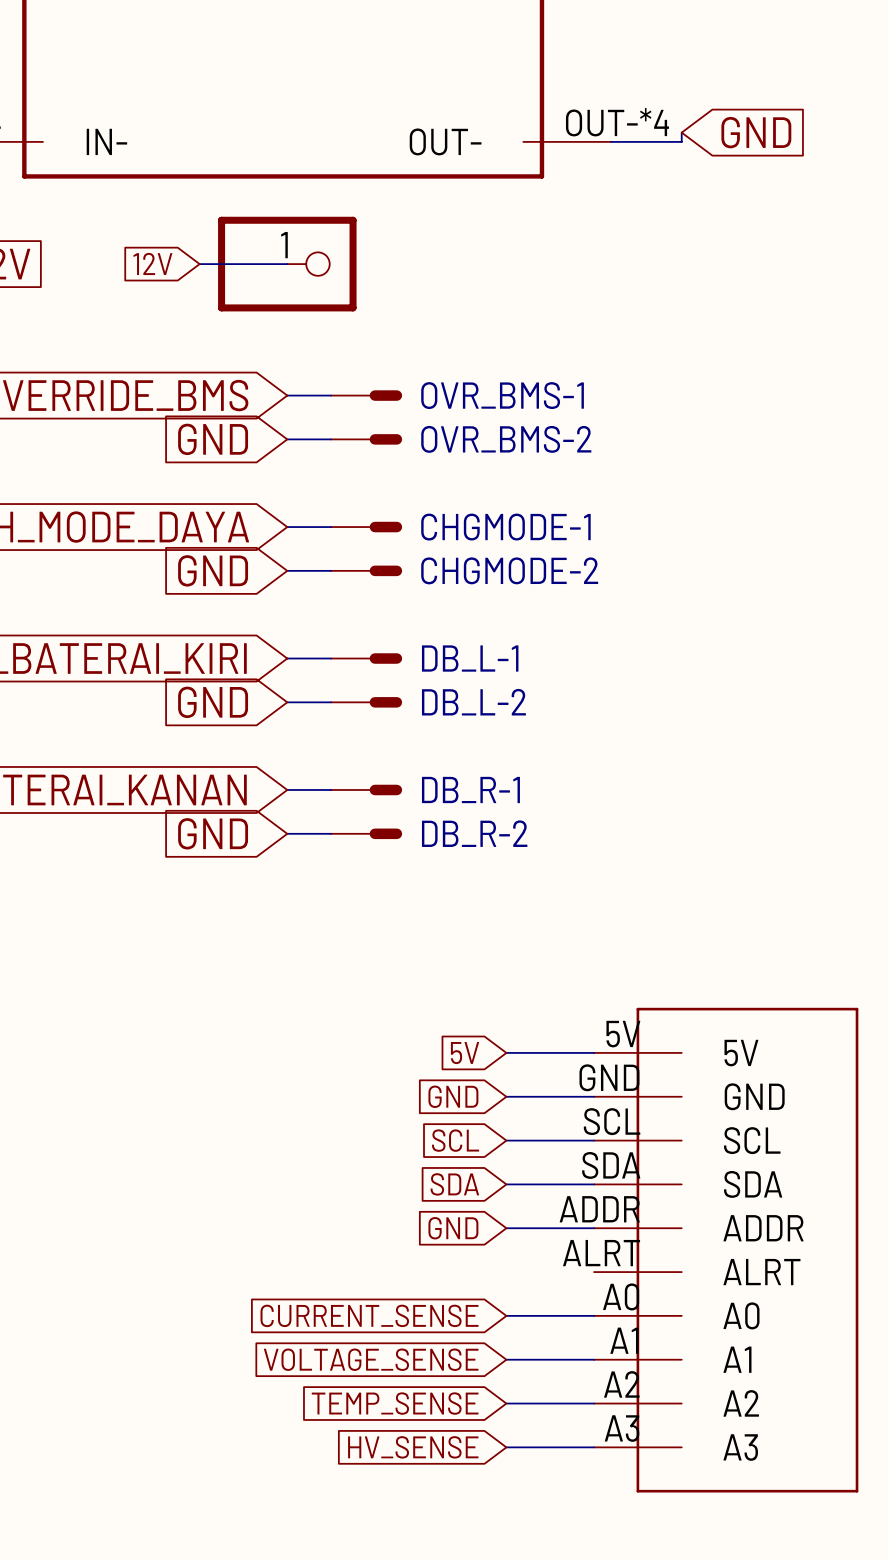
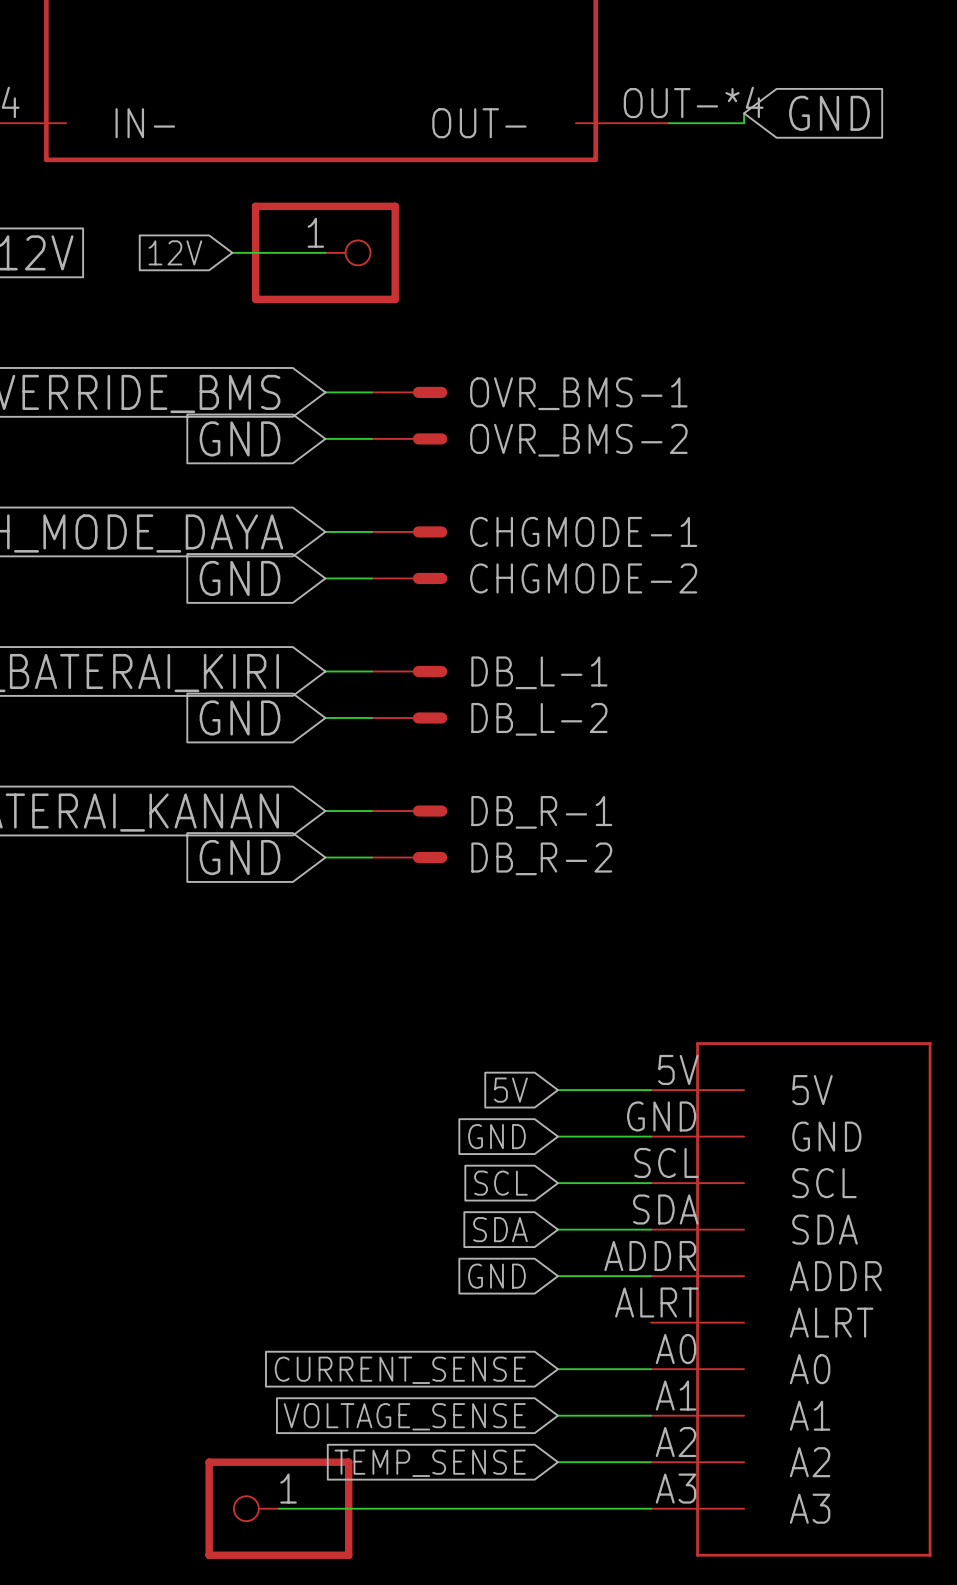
wire: none -> (278, 1508) (558, 1508)
part: none -> (278, 1508)
global label: HV_SENSE (413, 1447) -> none

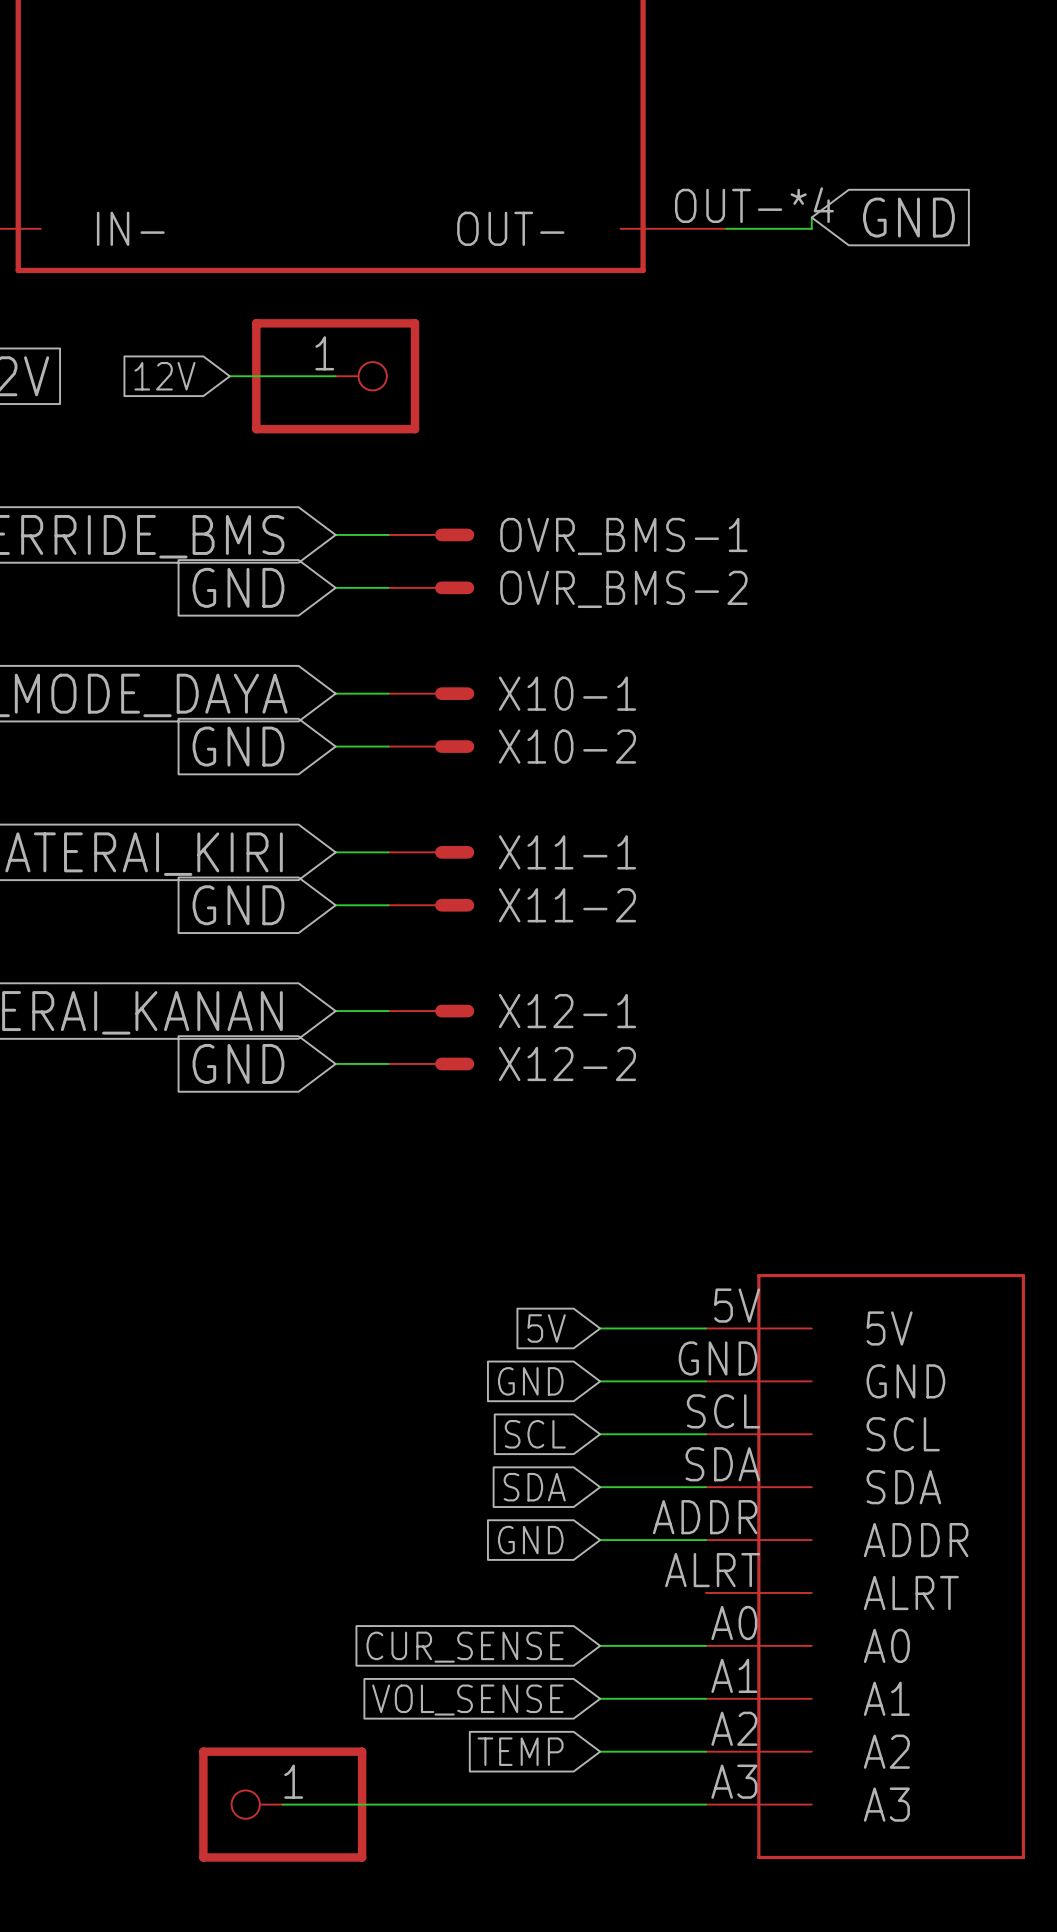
CHGMODE-1 name: CHGMODE-1 (583, 531) -> X10-1 (567, 693)
CHGMODE-2 name: CHGMODE-2 (583, 578) -> X10-2 (567, 746)
DB_L-1 name: DB_L-1 (539, 672) -> X11-1 (567, 852)
DB_L-2 name: DB_L-2 (539, 719) -> X11-2 (567, 905)
DB_R-1 name: DB_R-1 (541, 812) -> X12-1 (567, 1011)
DB_R-2 name: DB_R-2 (541, 858) -> X12-2 (567, 1063)
global label: CURRENT_SENSE (400, 1370) -> CUR_SENSE (465, 1647)
global label: VOLTAGE_SENSE (404, 1416) -> VOL_SENSE (467, 1700)
global label: TEMP_SENSE (430, 1463) -> TEMP (520, 1751)

